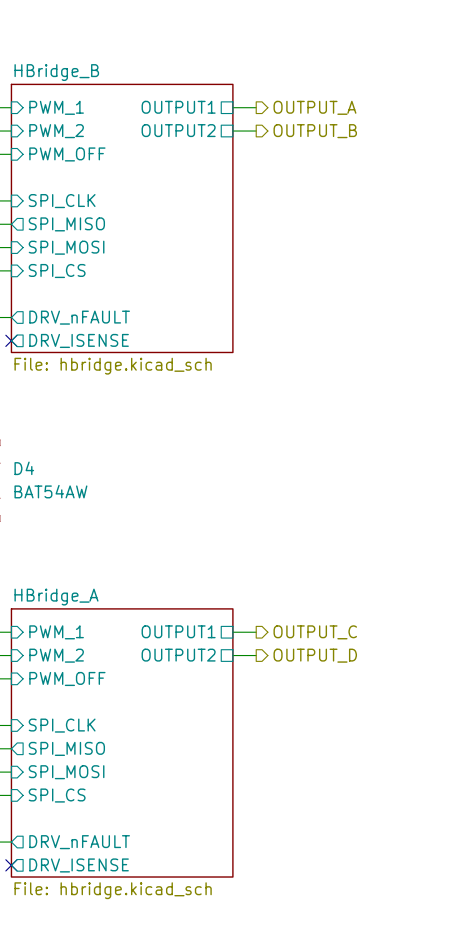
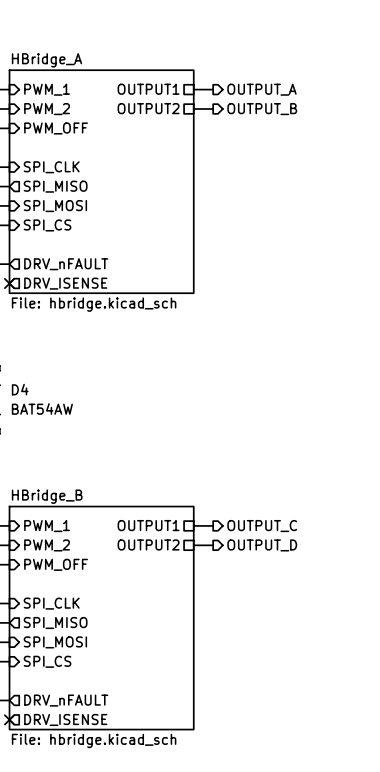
sheet HBridge_B name: HBridge_B (56, 72) -> HBridge_A (46, 60)
sheet HBridge_A name: HBridge_A (56, 597) -> HBridge_B (47, 496)

